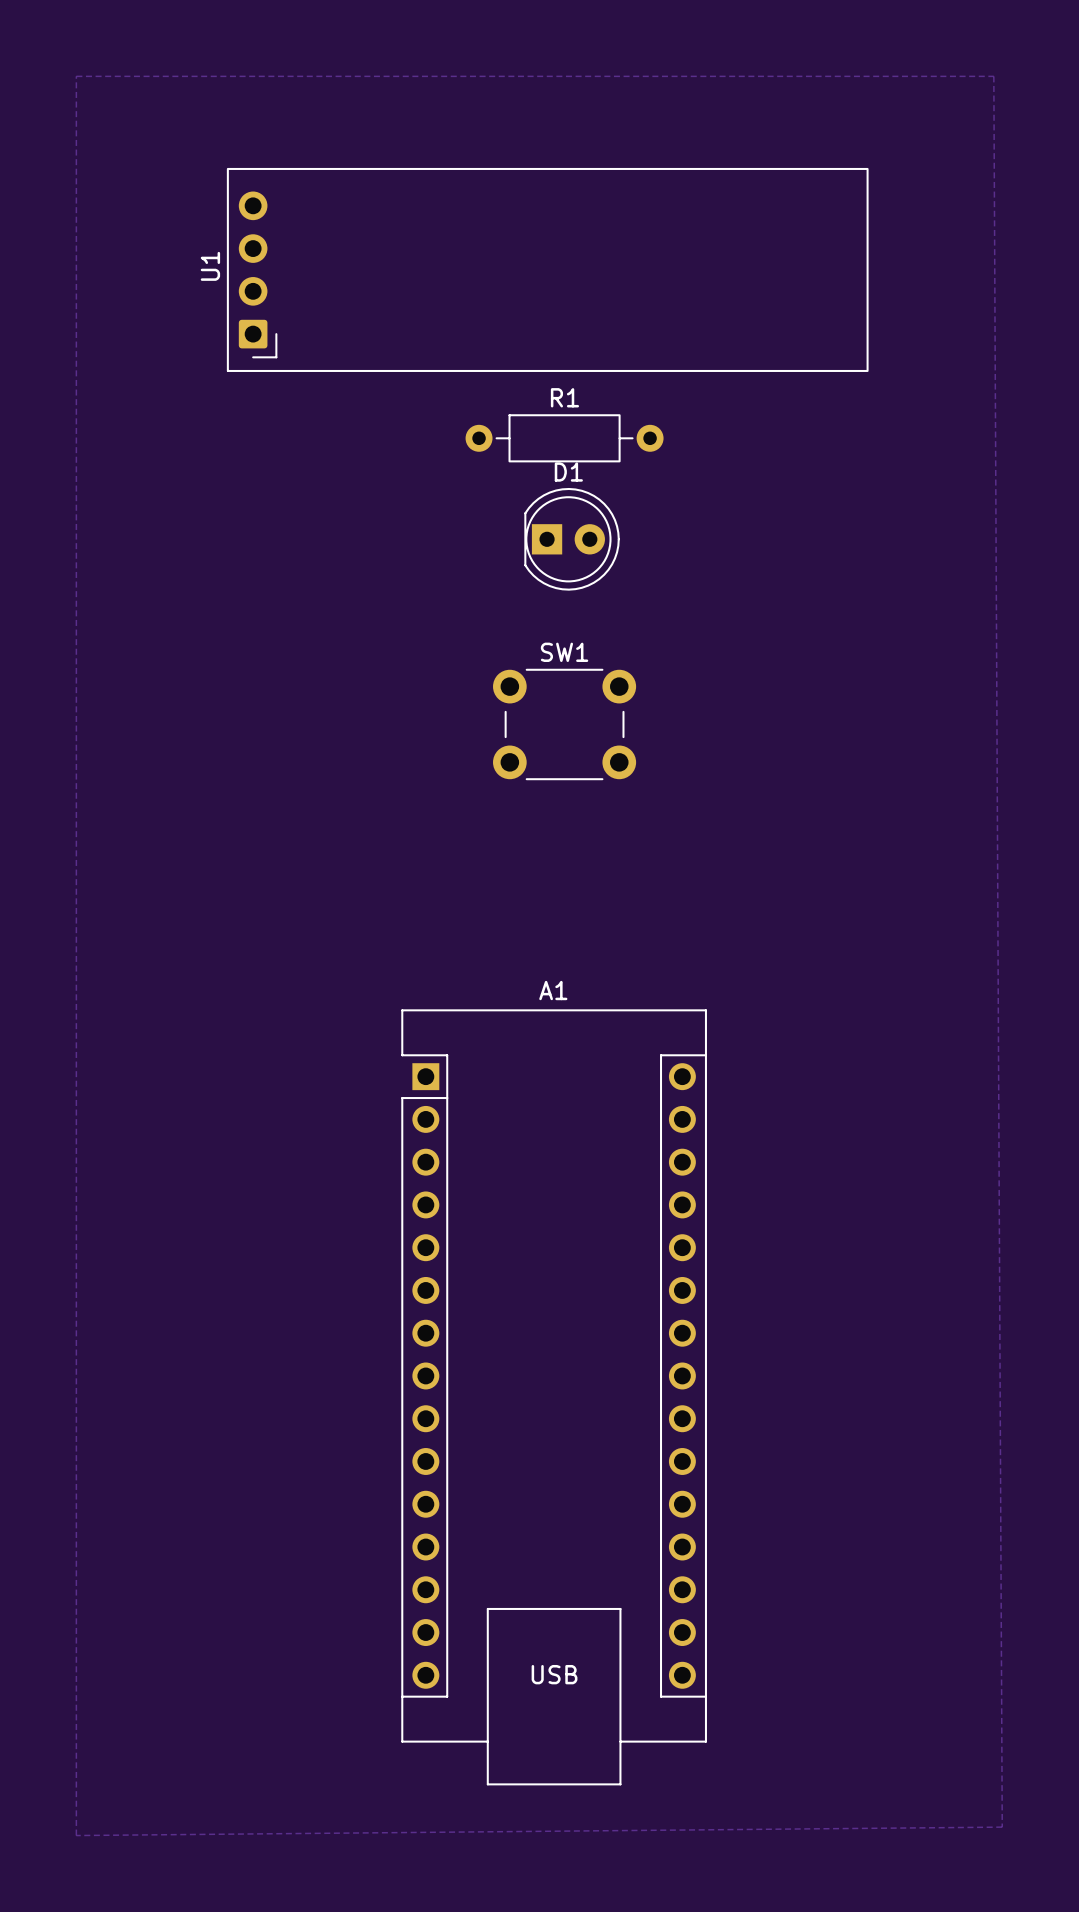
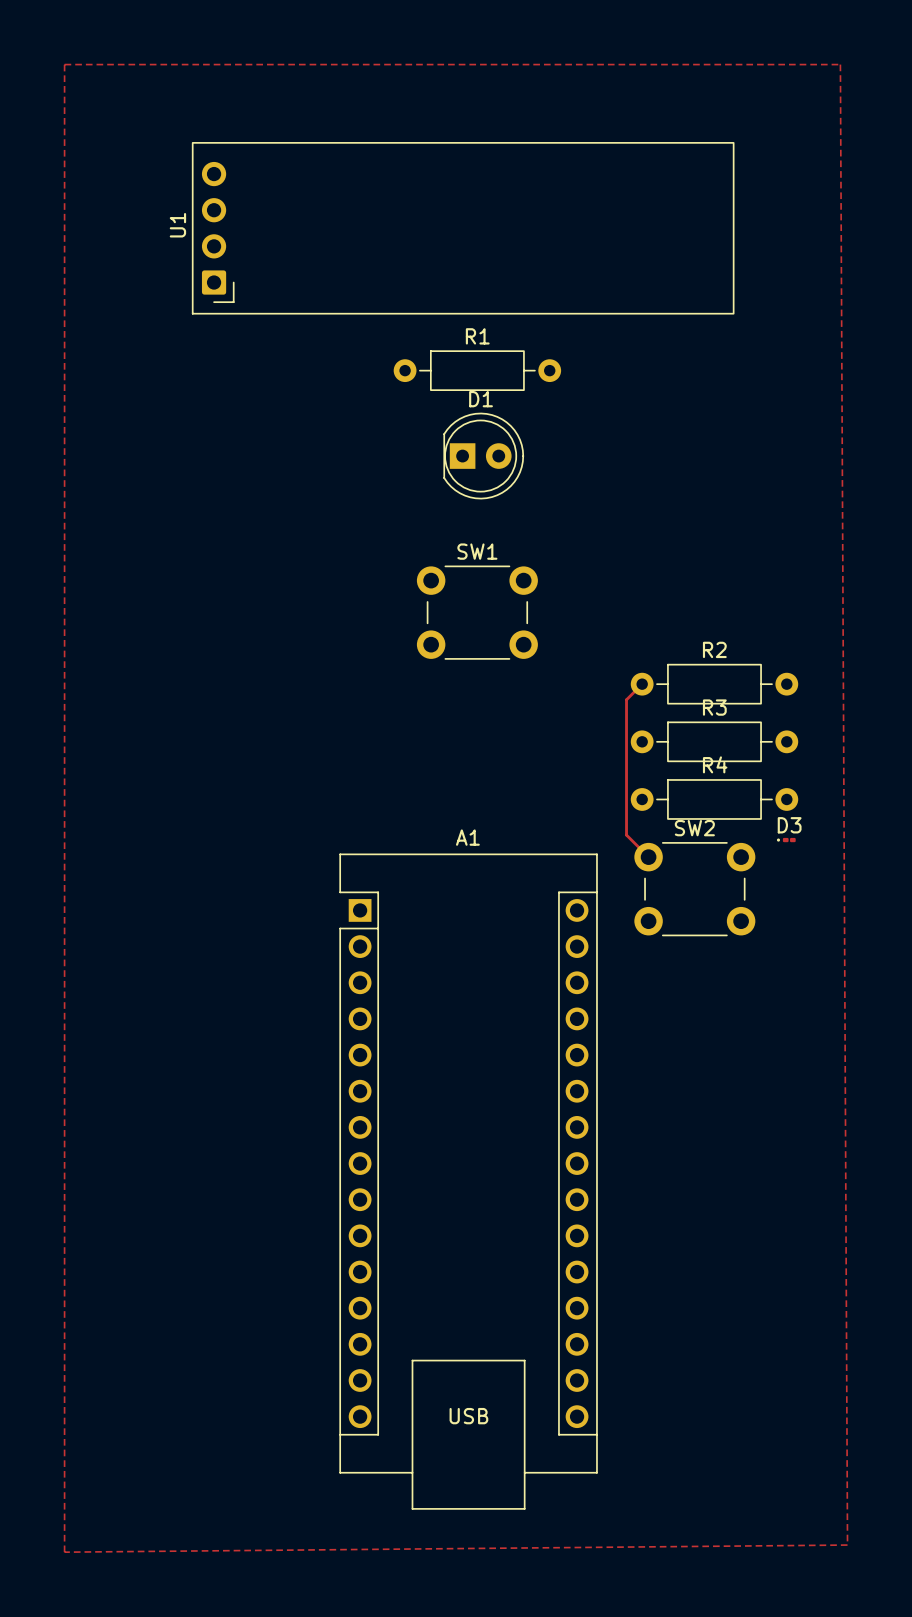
track: none -> (642, 684) (626, 699) (626, 835) (648, 857)
R2: none -> (714, 684)
R3: none -> (714, 741)
R4: none -> (714, 799)
D3: none -> (786, 840)
SW2: none -> (694, 889)

